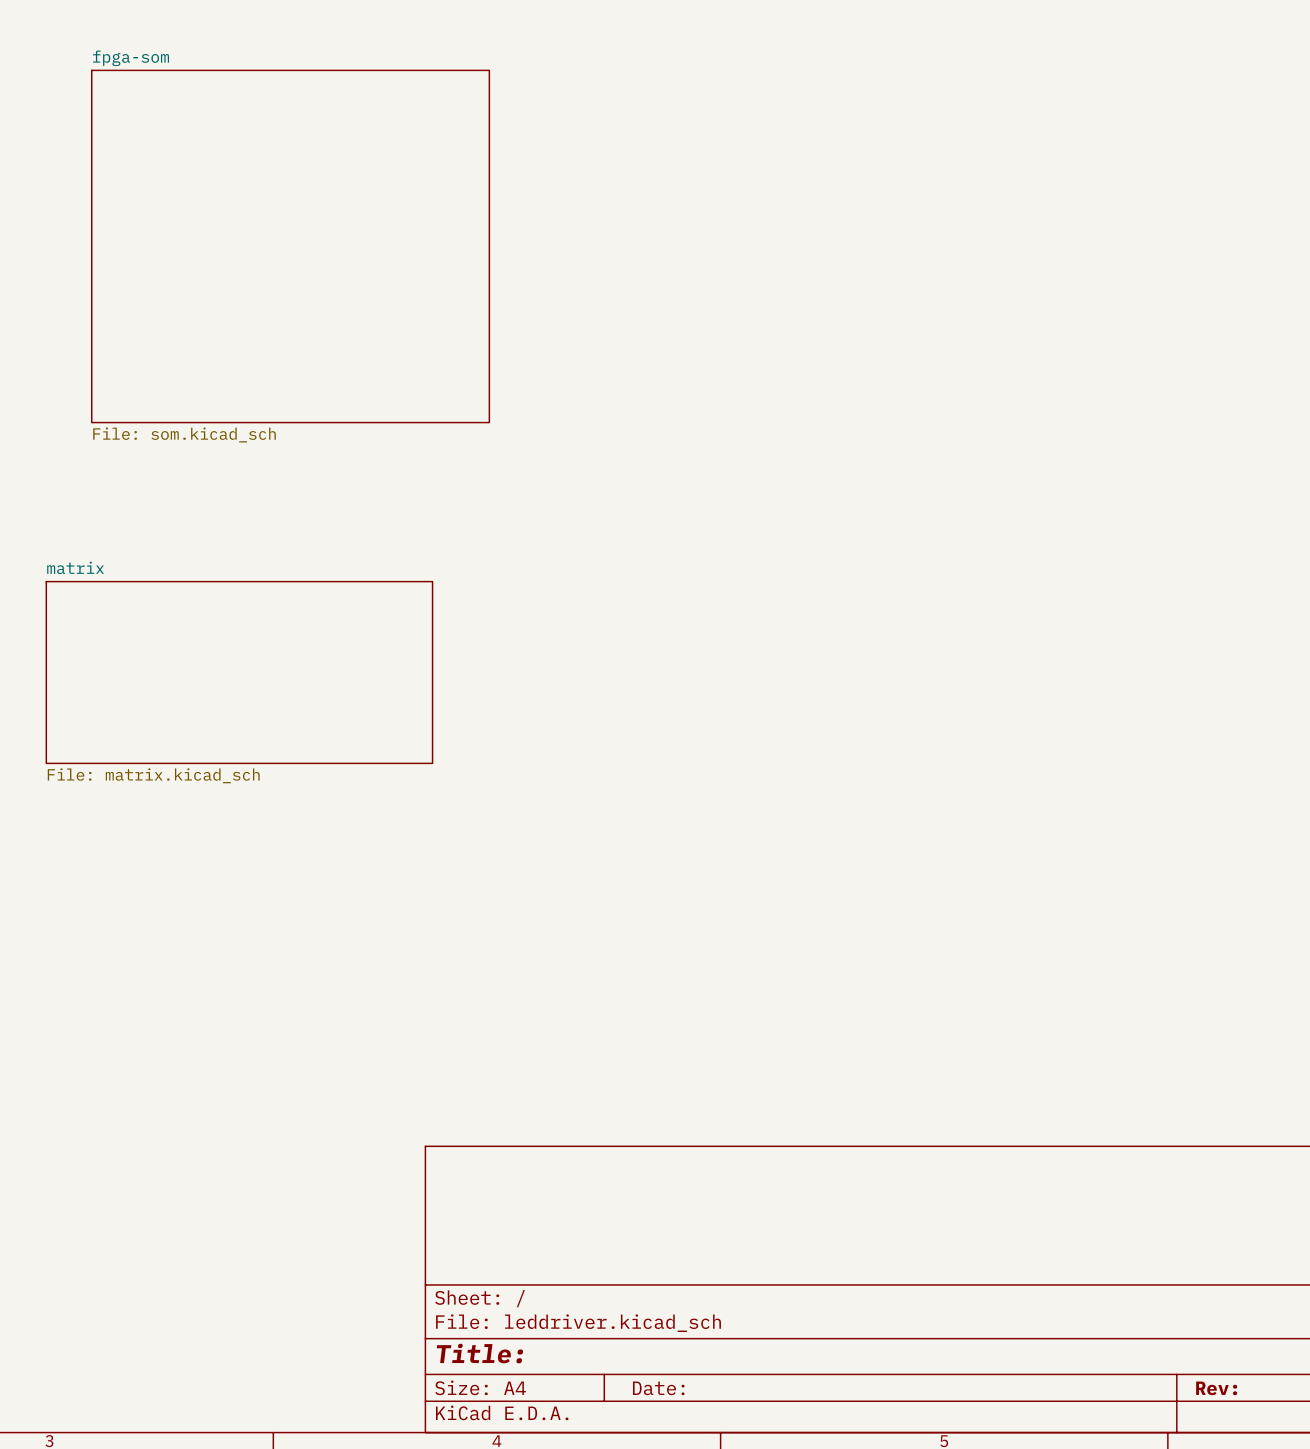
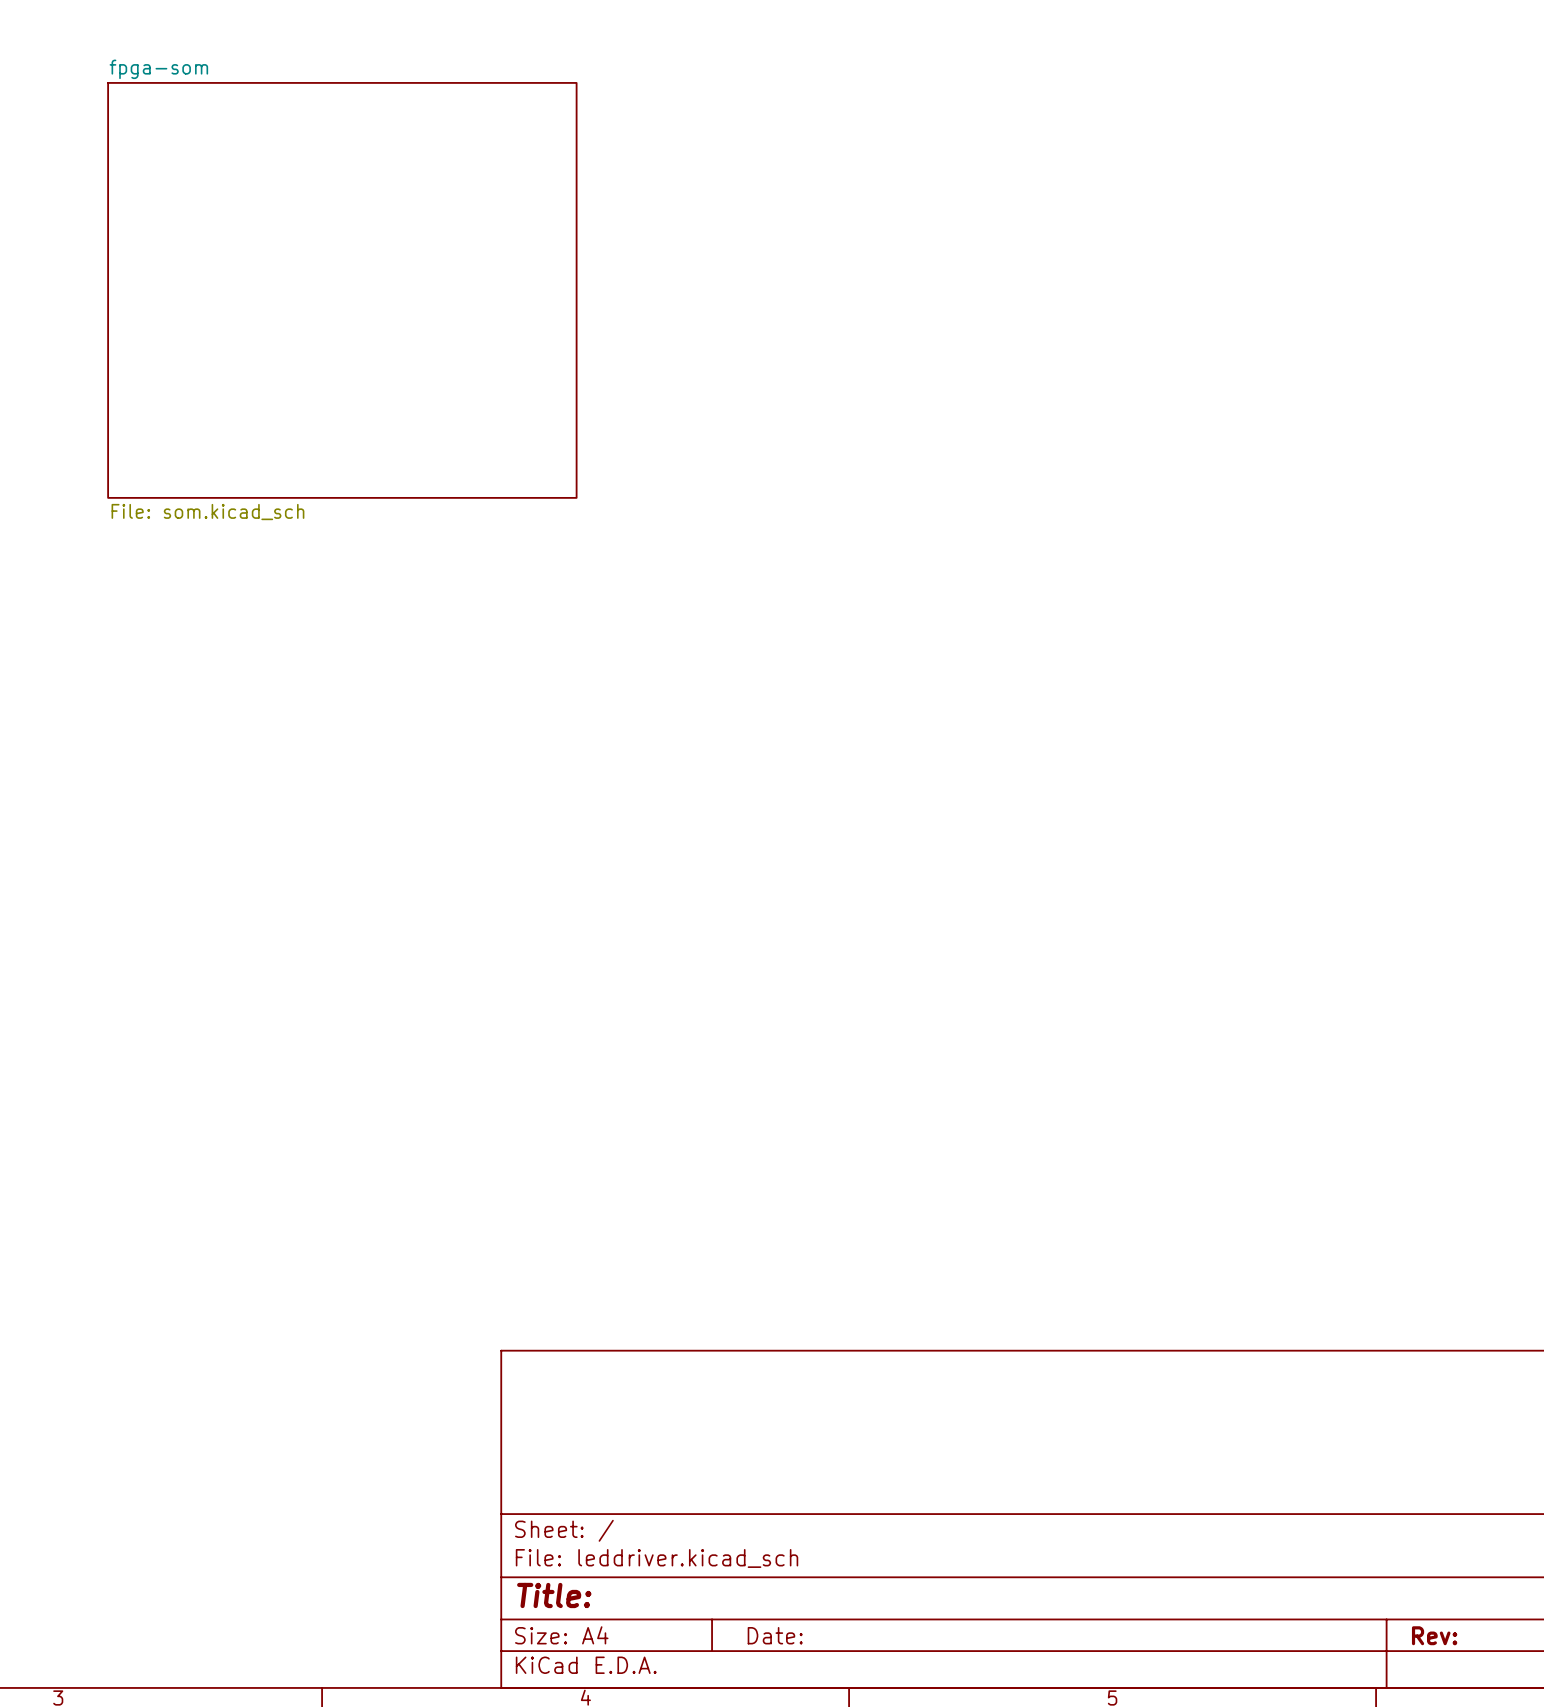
sheet matrix: File: matrix.kicad_sch (239, 672) -> none

